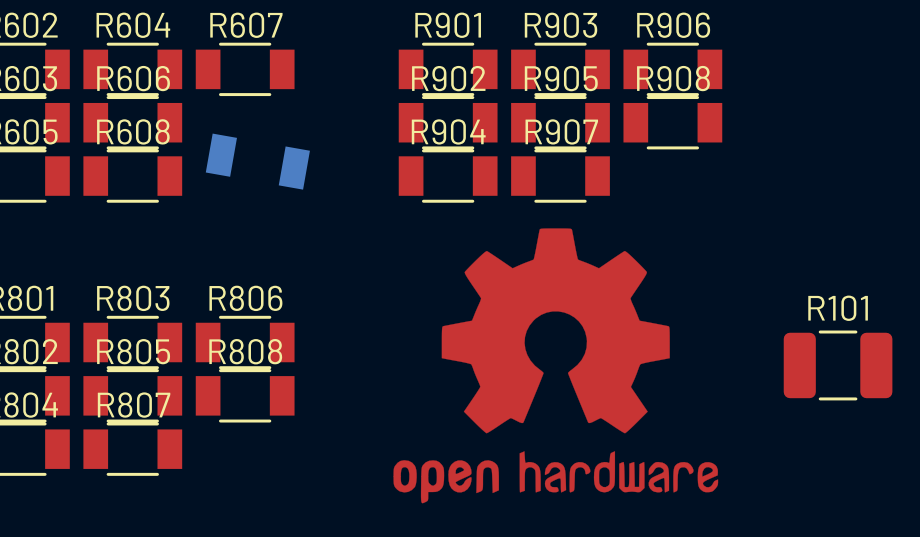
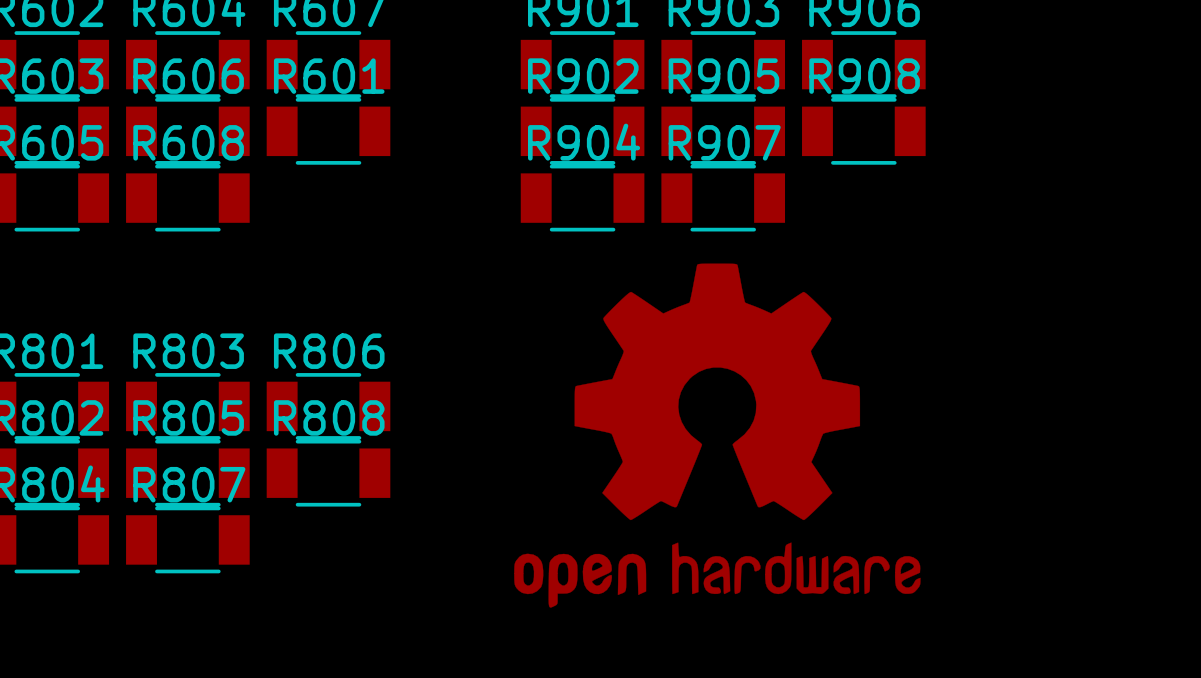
R601 side: bottom (257, 161) -> top (328, 131)
R101: (838, 365) -> none

